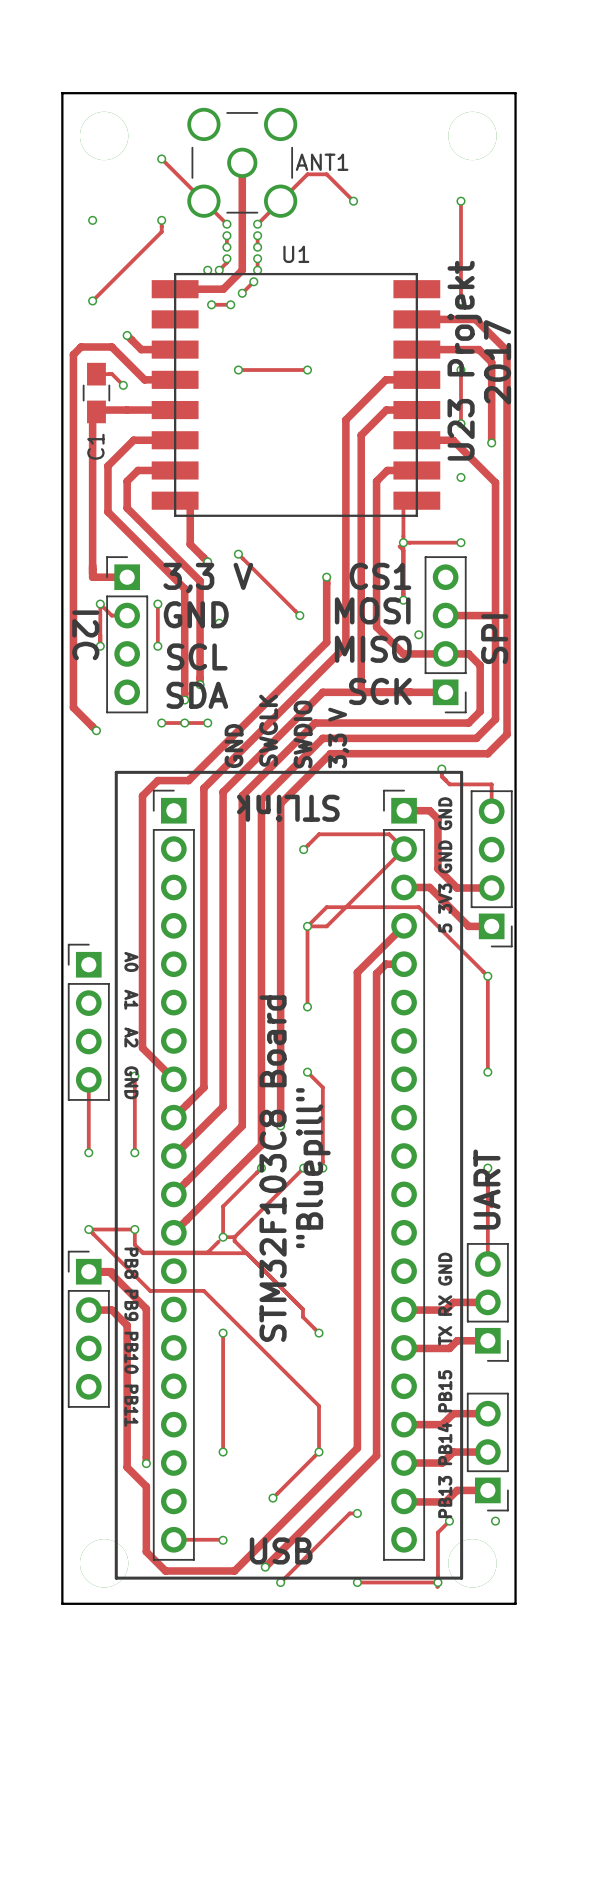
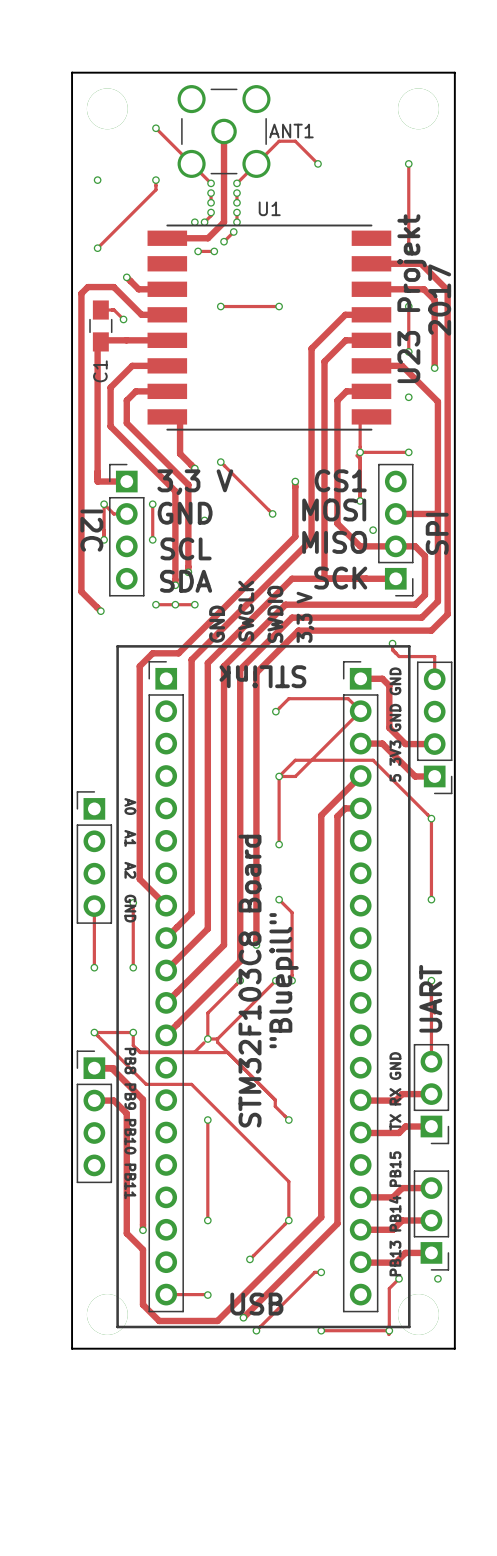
U1 footprint: [151, 272, 441, 517] -> [147, 224, 392, 431]

